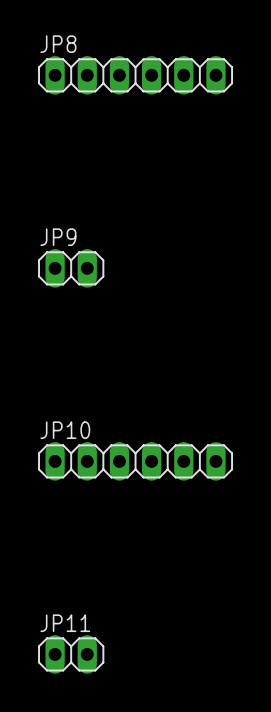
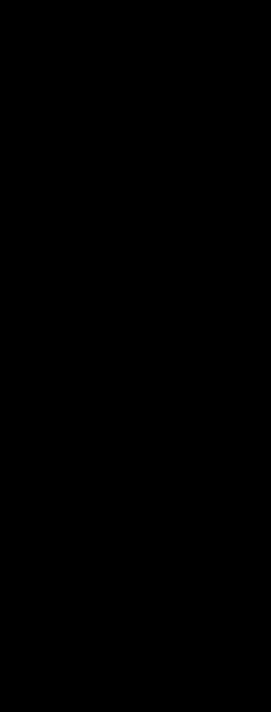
JP8: (135, 75) -> none
JP9: (71, 268) -> none
JP10: (135, 461) -> none
JP11: (71, 654) -> none

